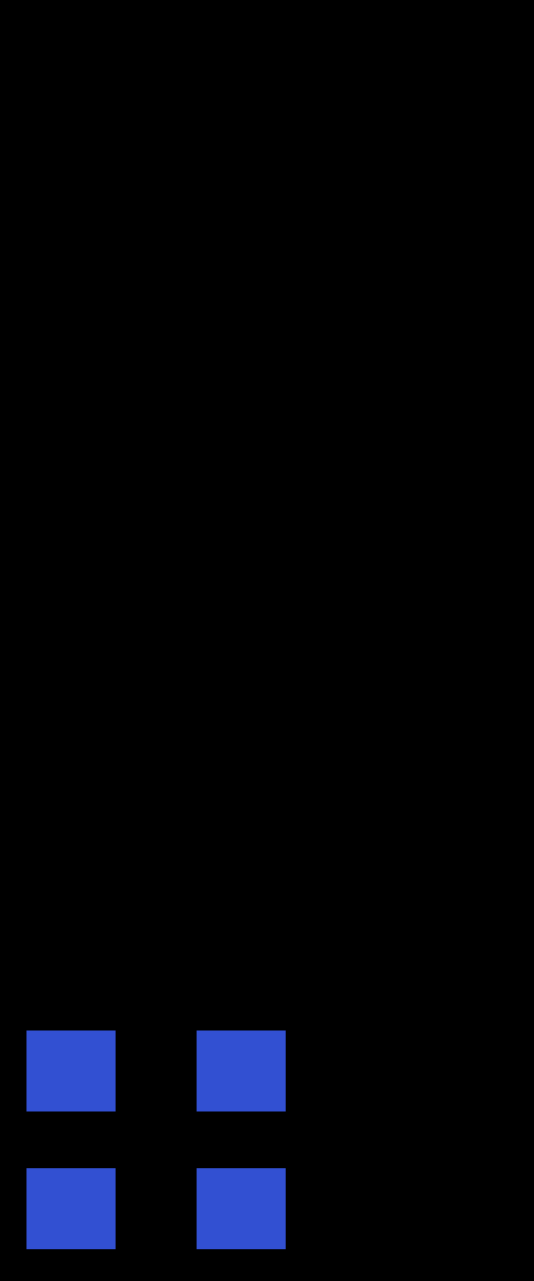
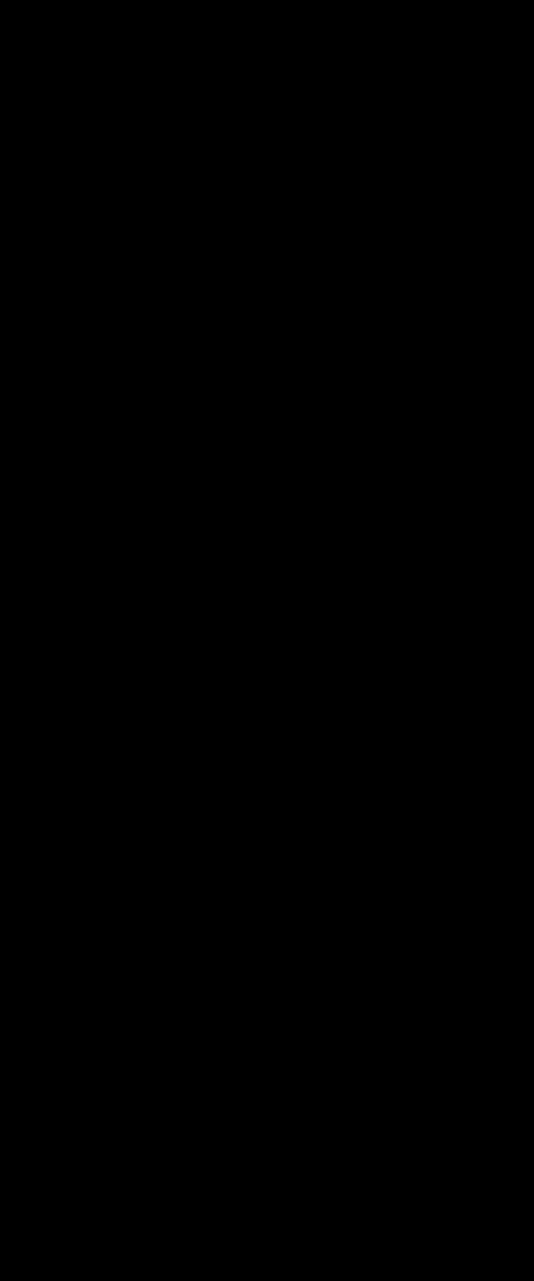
part: (71, 1139) -> none
part: (241, 1139) -> none

